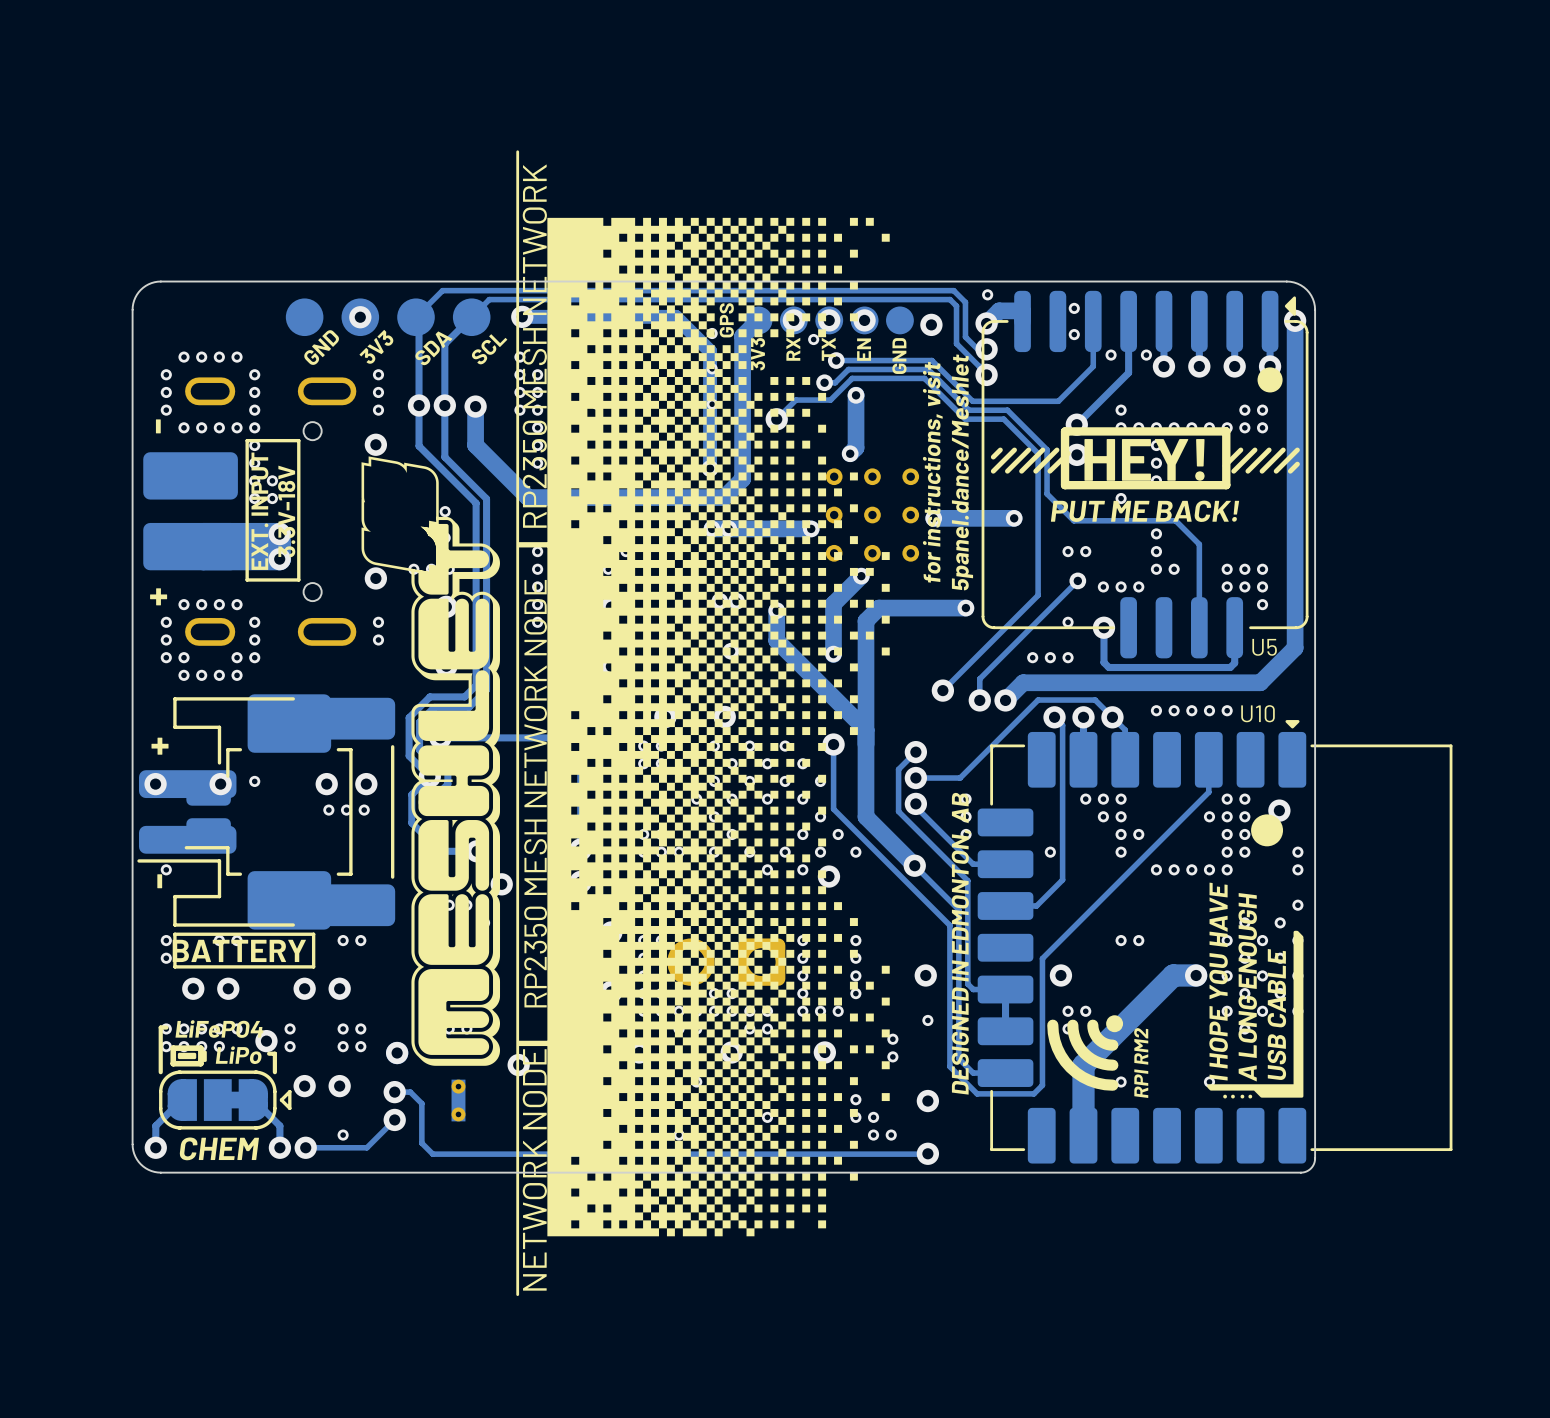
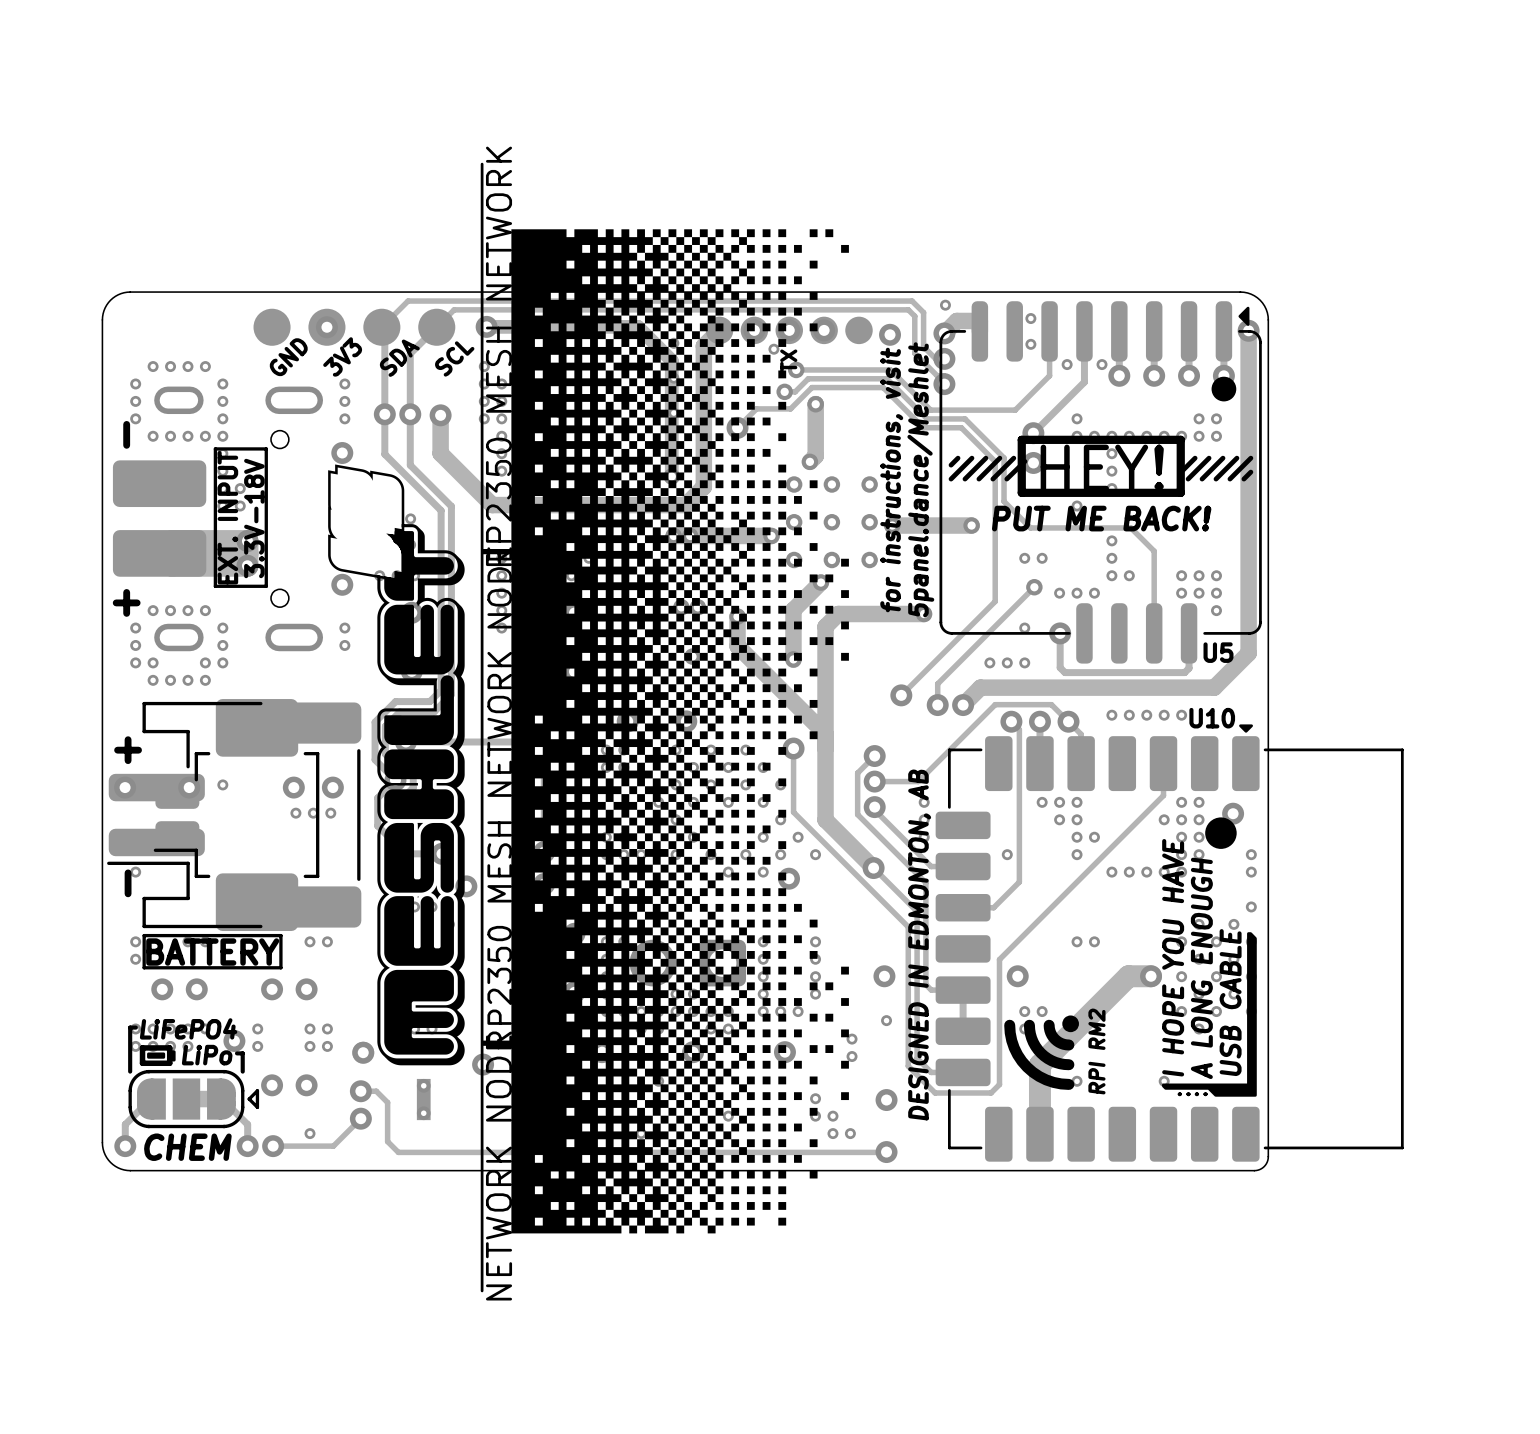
drawing: none -> [676, 307, 787, 395]
text: GPS (726, 320) -> none
text: RX (793, 349) -> none
text: EN (864, 349) -> none
text: 3V3 (758, 354) -> none
text: GND (899, 356) -> none

